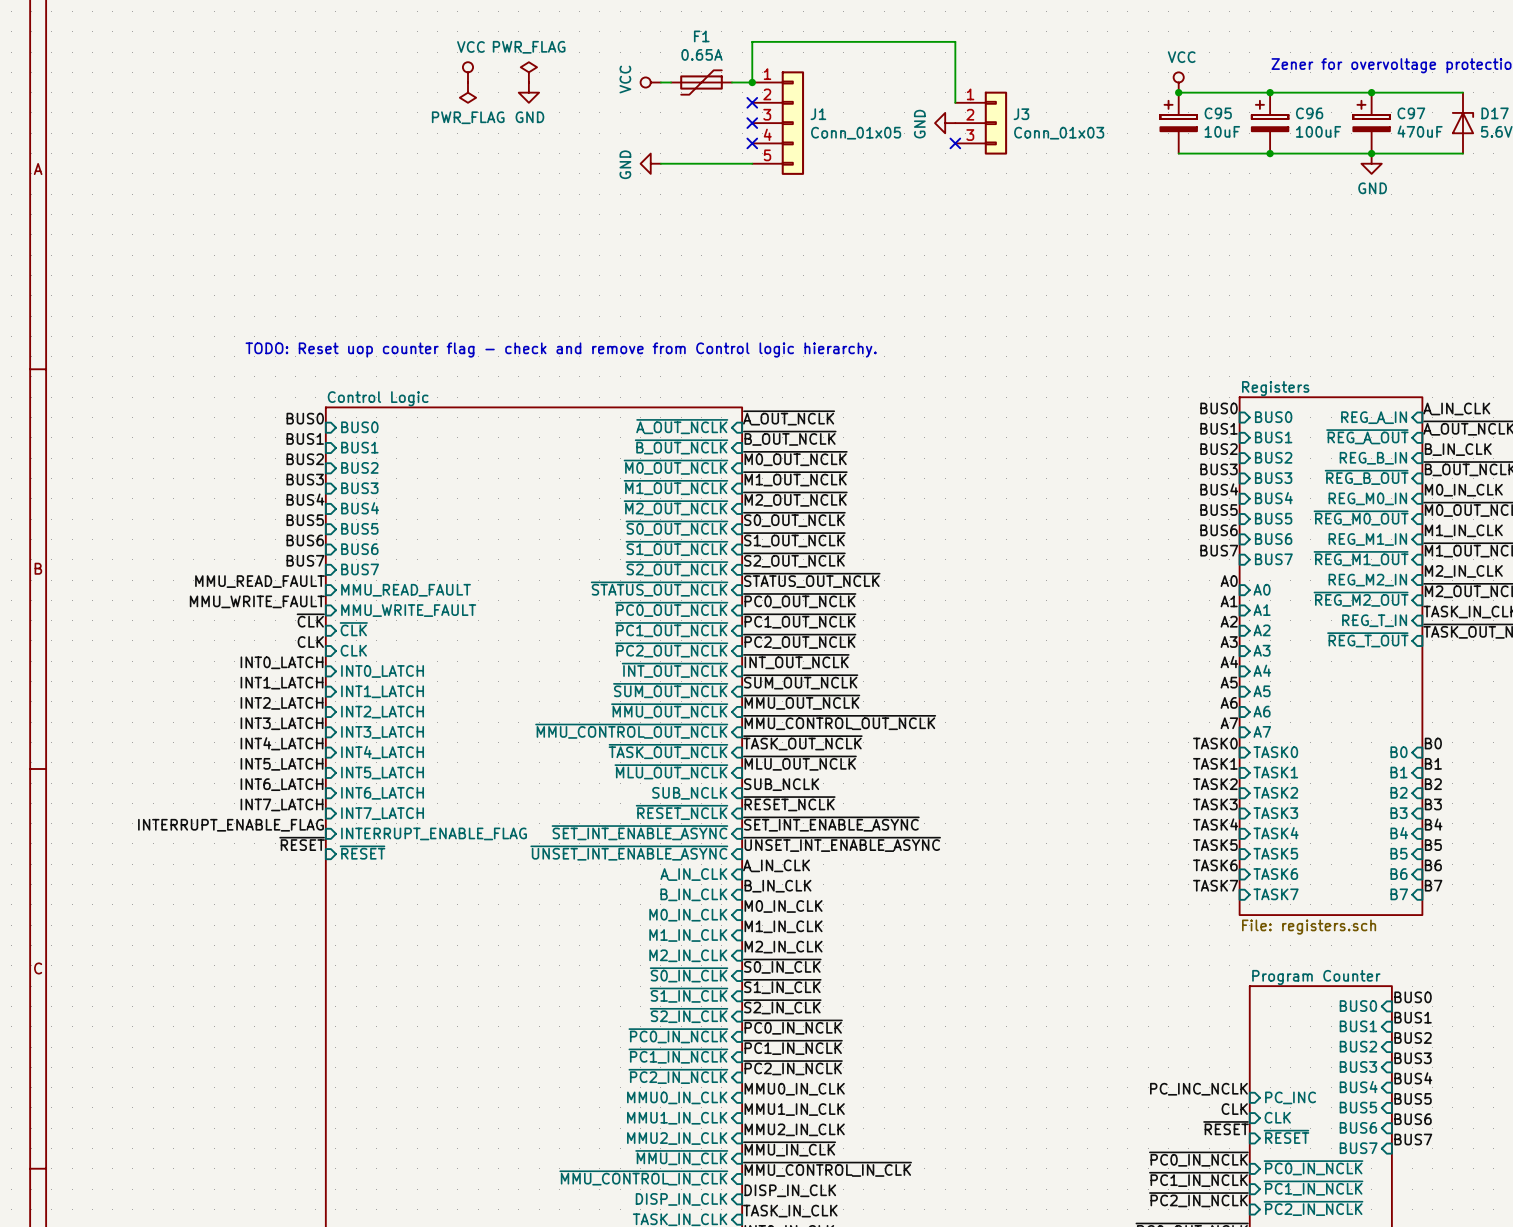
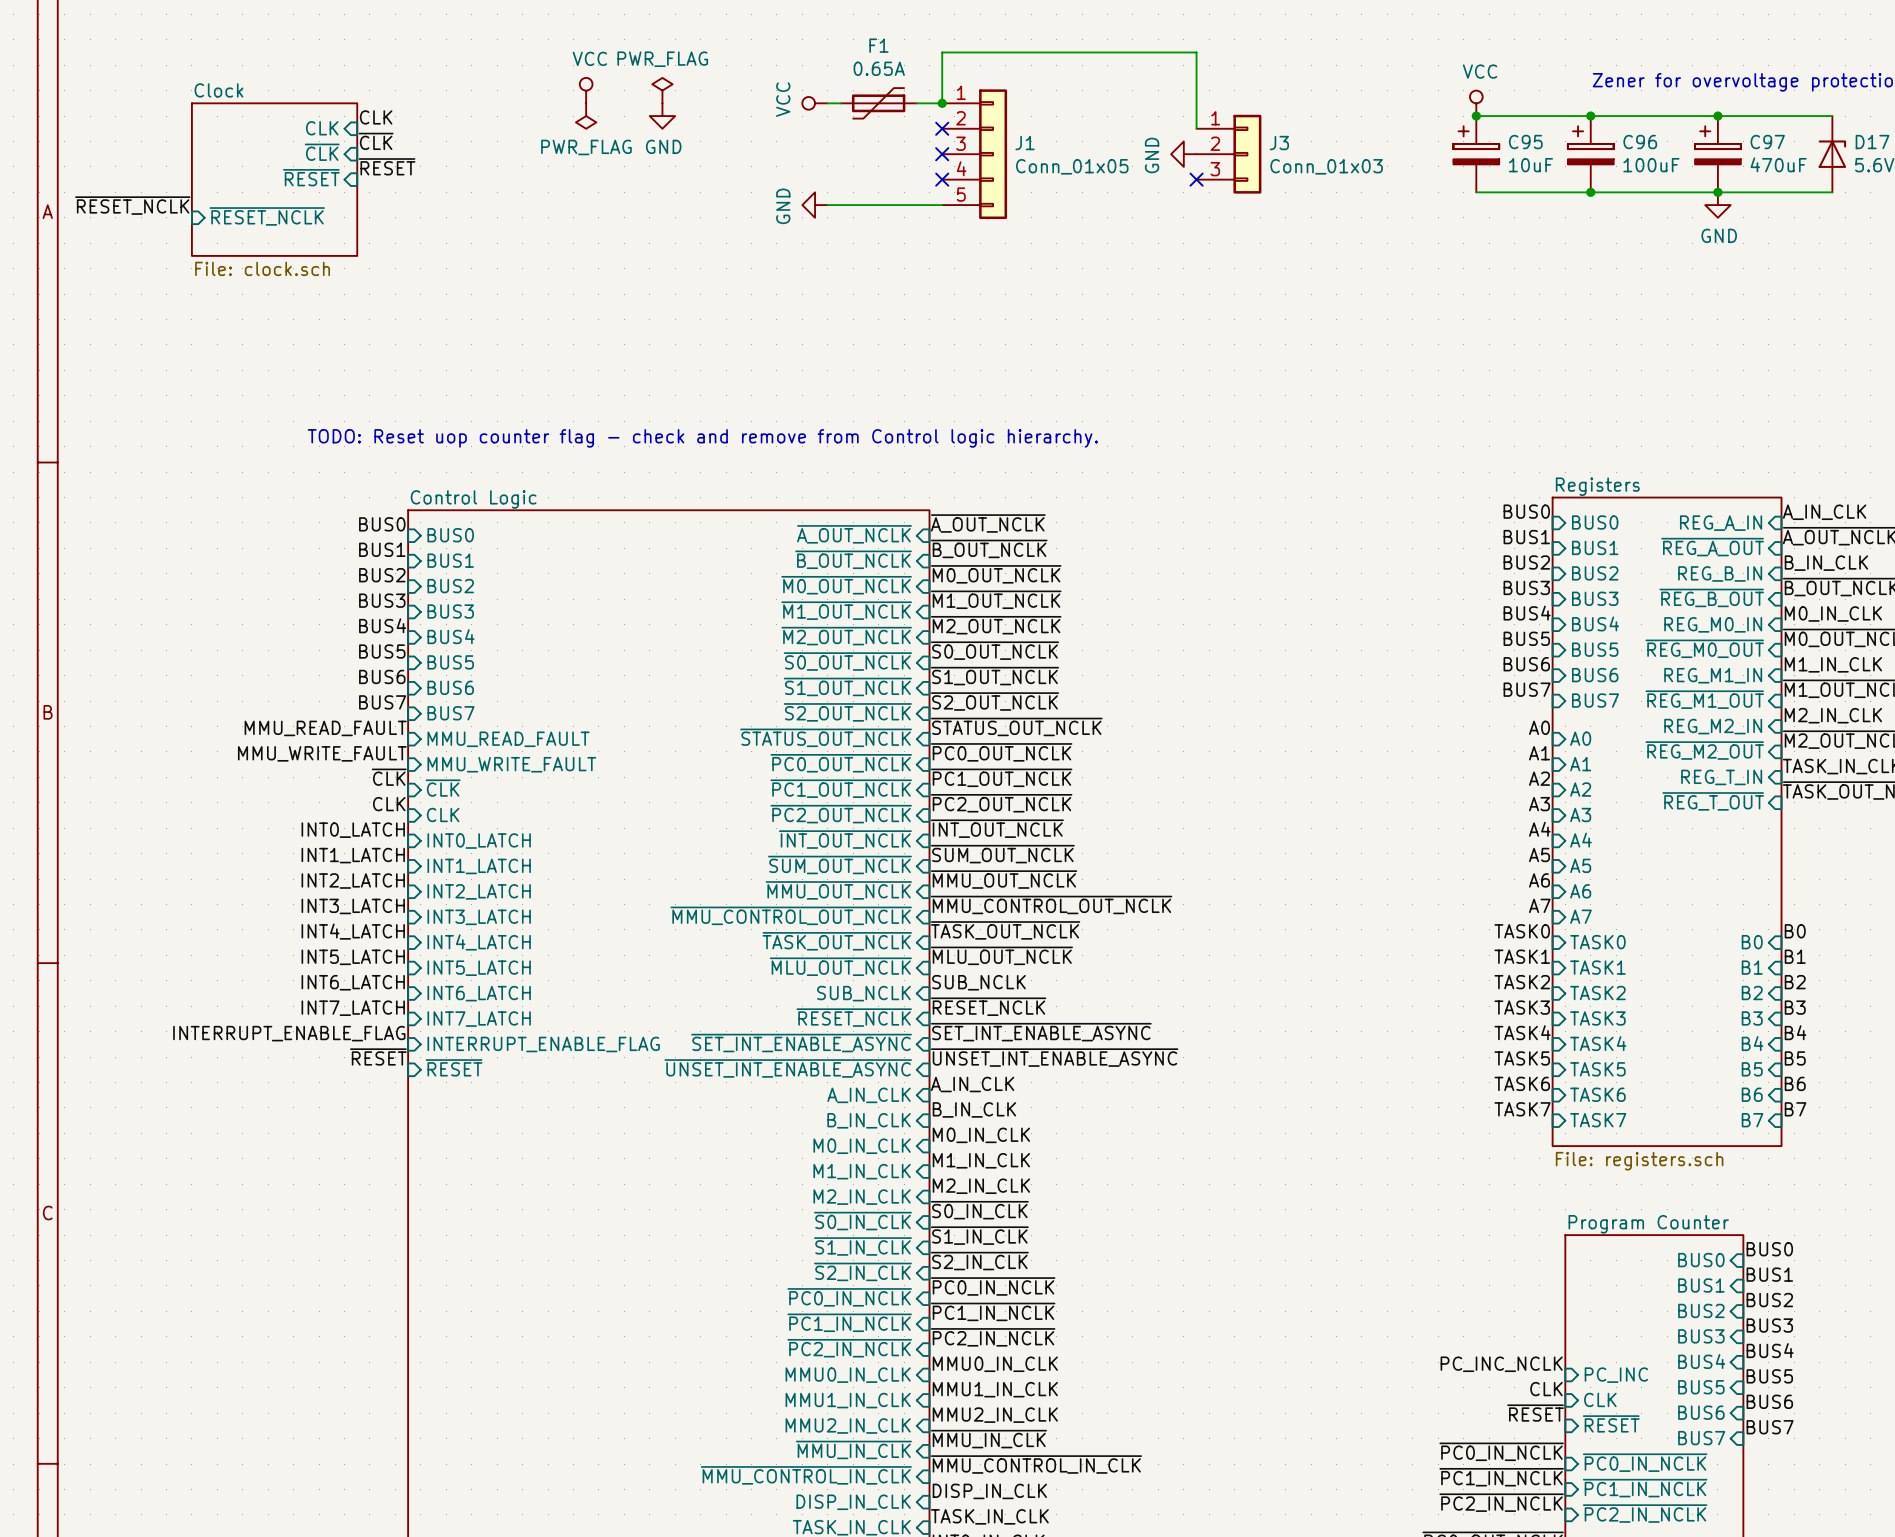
label: none -> CLK (376, 117)
sheet pin: none -> CLK (322, 128)
label: none -> ~{CLK} (376, 141)
sheet pin: none -> ~{CLK} (322, 152)
label: none -> ~{RESET} (387, 166)
sheet pin: none -> ~{RESET} (311, 177)
sheet Clock: none -> File: clock.sch (274, 179)
label: none -> ~{RESET_NCLK} (132, 205)
sheet pin: none -> ~{RESET_NCLK} (267, 216)

